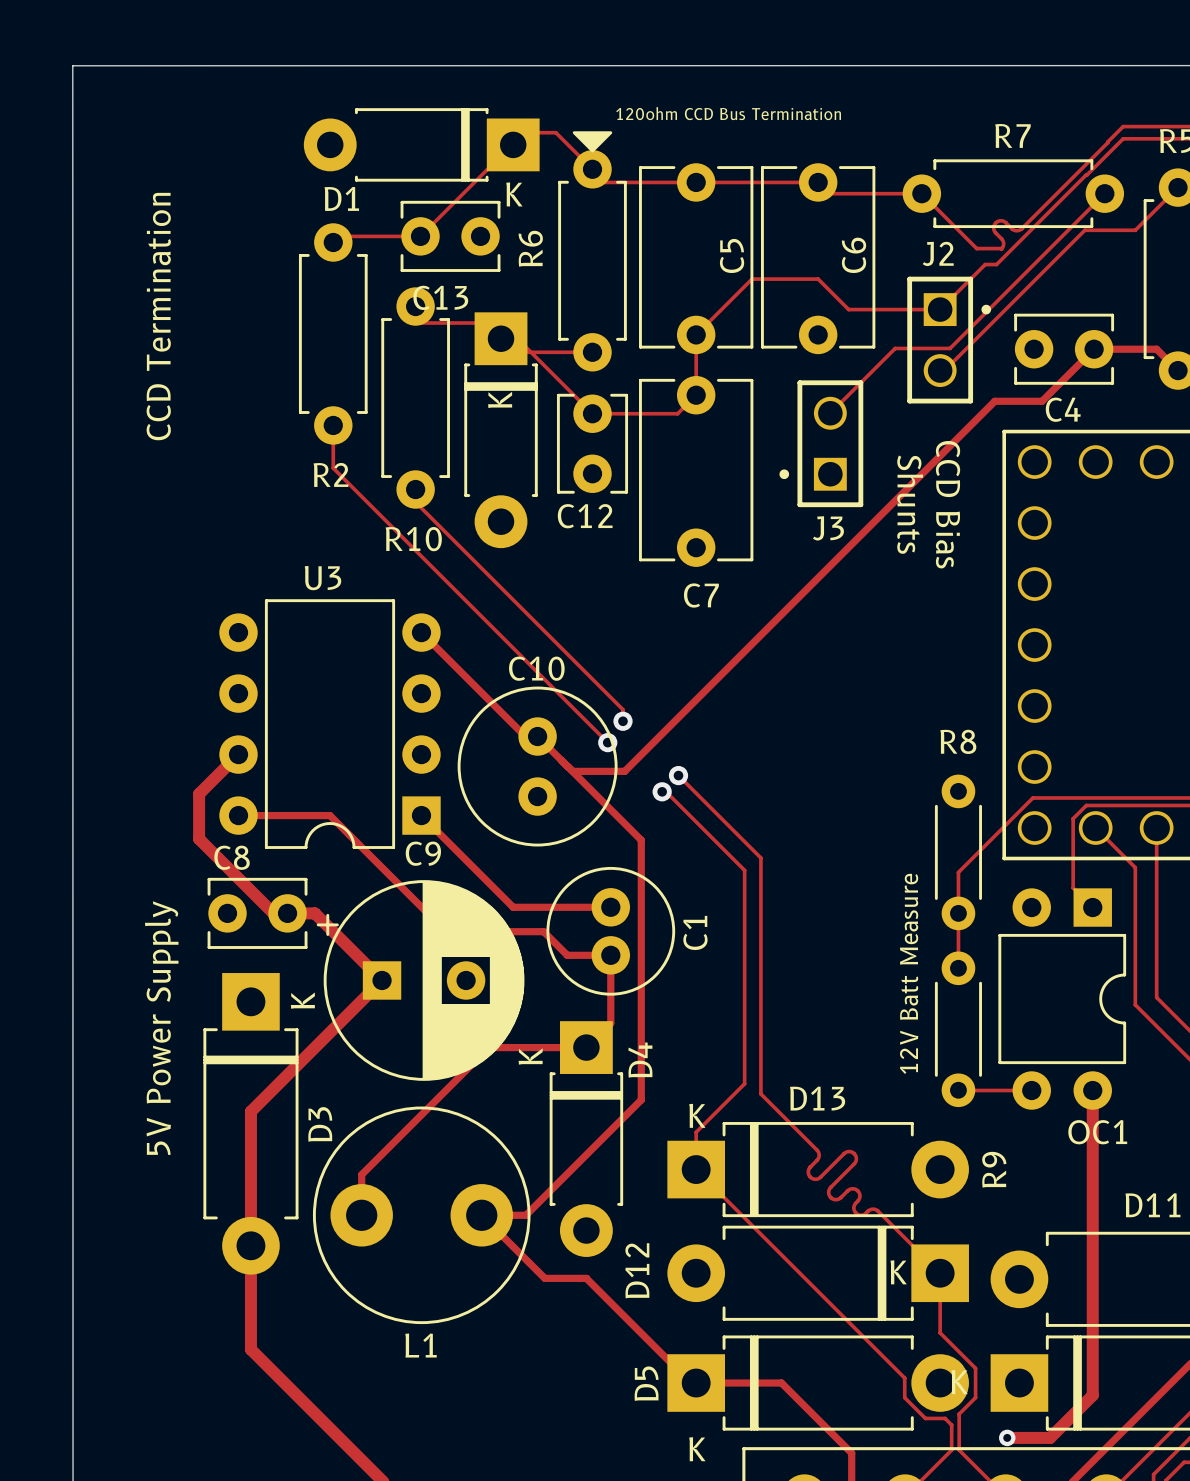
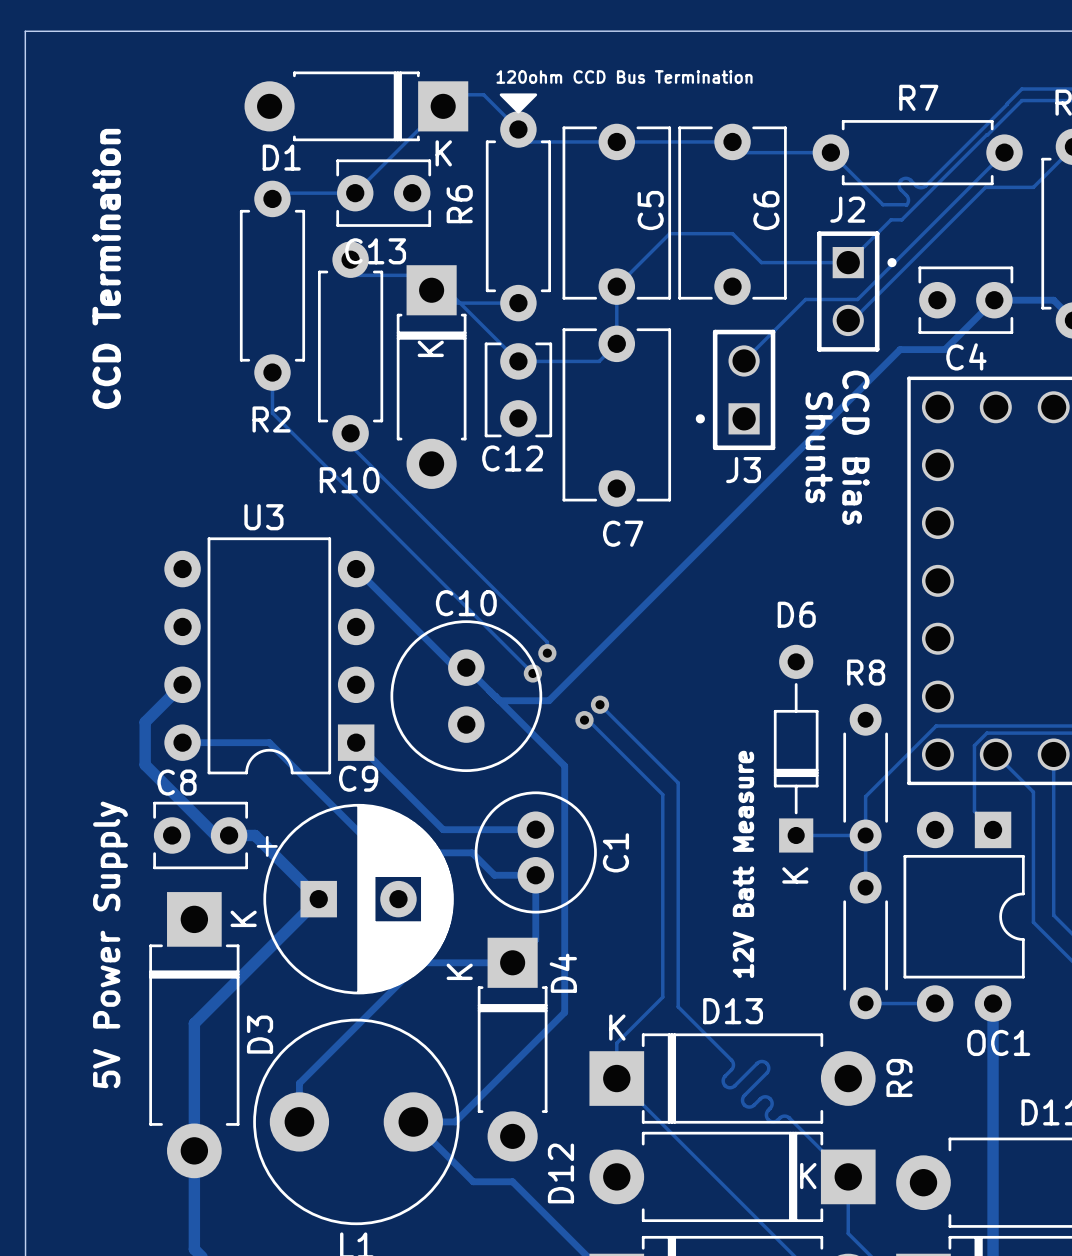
D6: none -> (796, 748)
track: none -> (796, 835) (865, 835)
text position: 12V Batt Measure (909, 973) -> 12V Batt Measure (743, 864)

